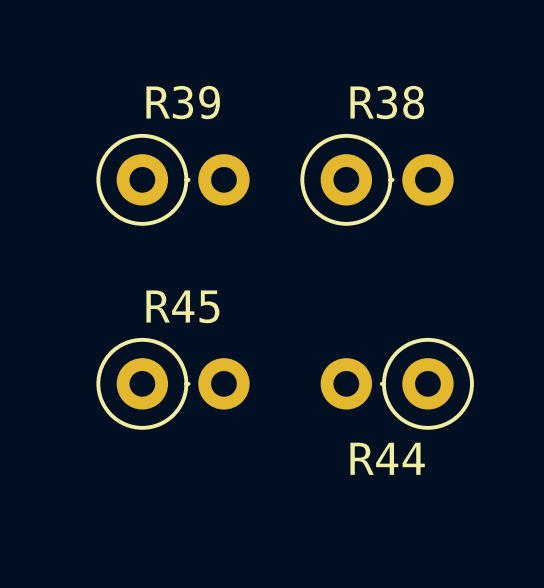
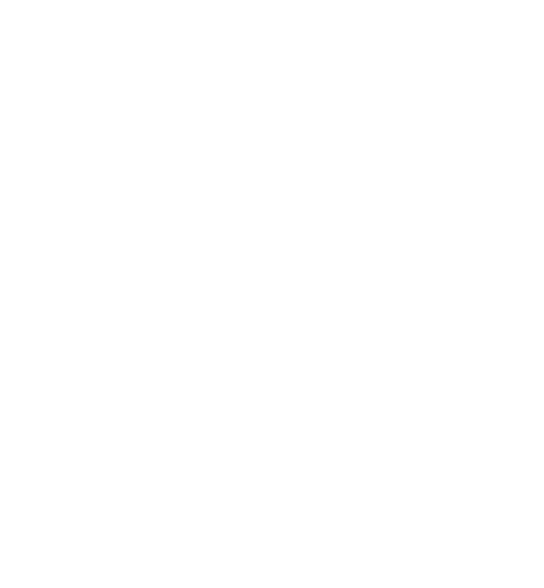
R39: (173, 179) -> none
R38: (377, 179) -> none
R45: (173, 383) -> none
R44: (397, 383) -> none

